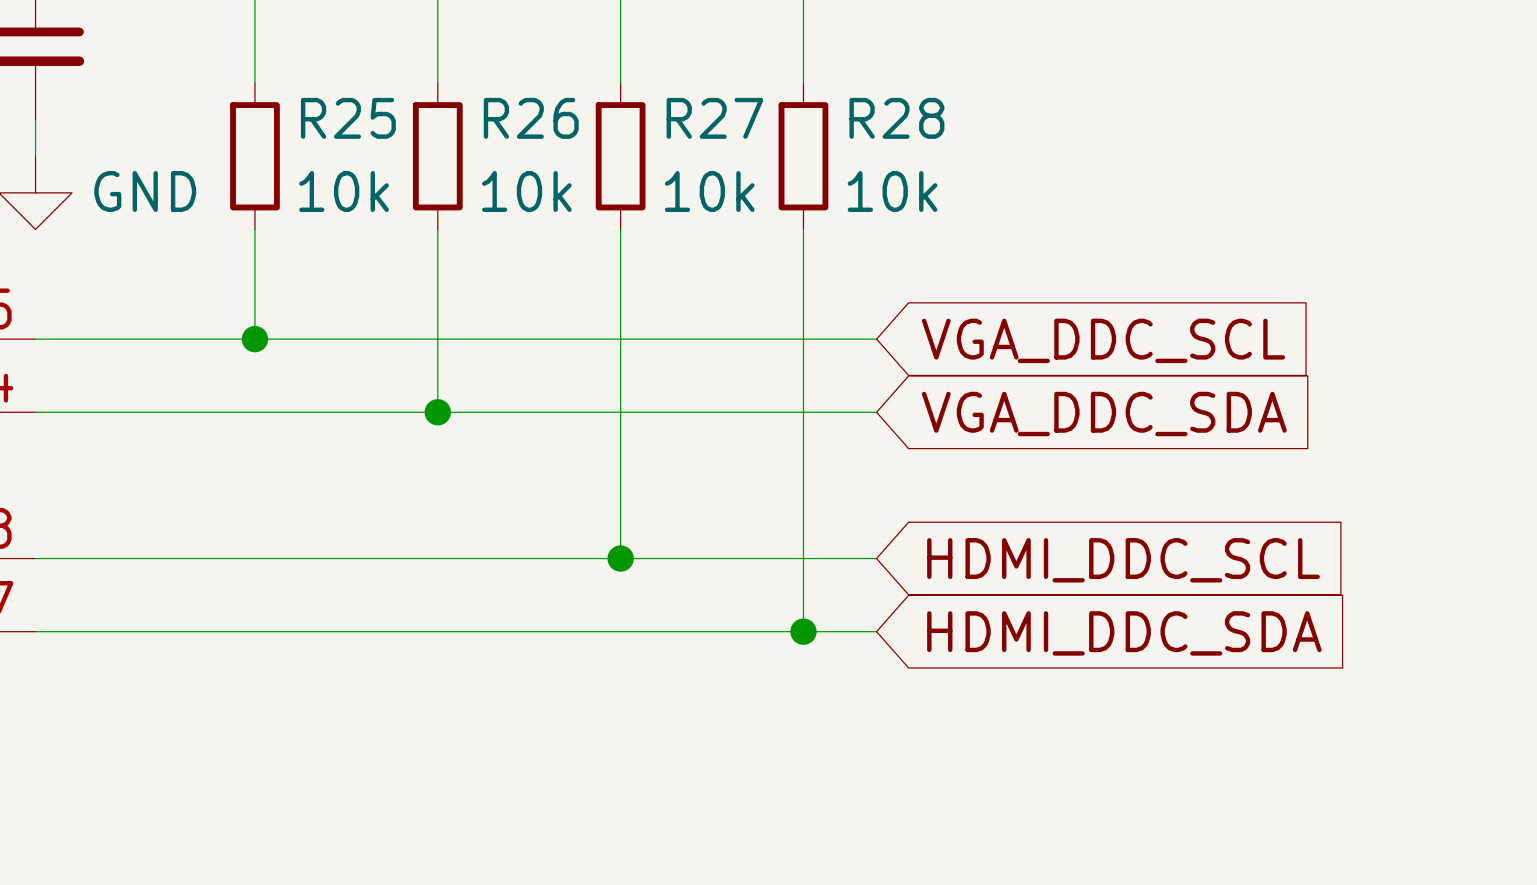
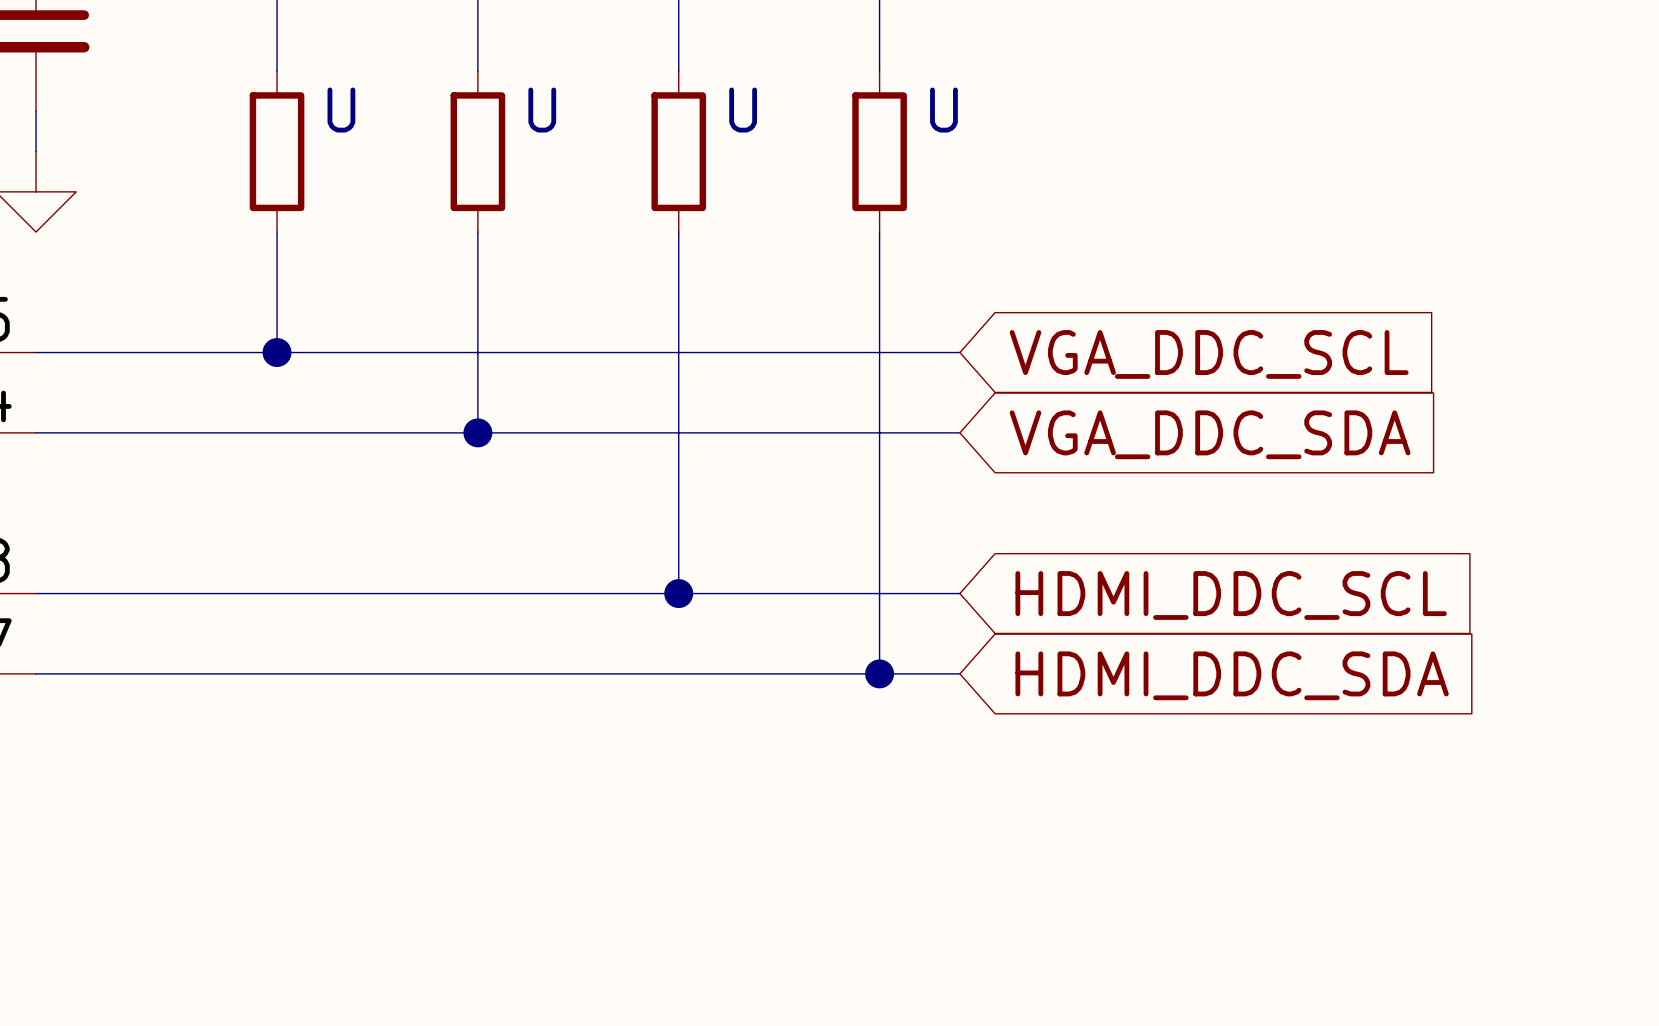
R25 name: R25 (348, 118) -> U (341, 110)
R26 name: R26 (531, 118) -> U (542, 110)
R27 name: R27 (714, 118) -> U (743, 110)
R28 name: R28 (896, 118) -> U (943, 110)
power symbol text: GND (145, 191) -> none
R25 value: 10k (344, 191) -> none
R26 value: 10k (526, 191) -> none
R27 value: 10k (709, 191) -> none
R28 value: 10k (892, 191) -> none

